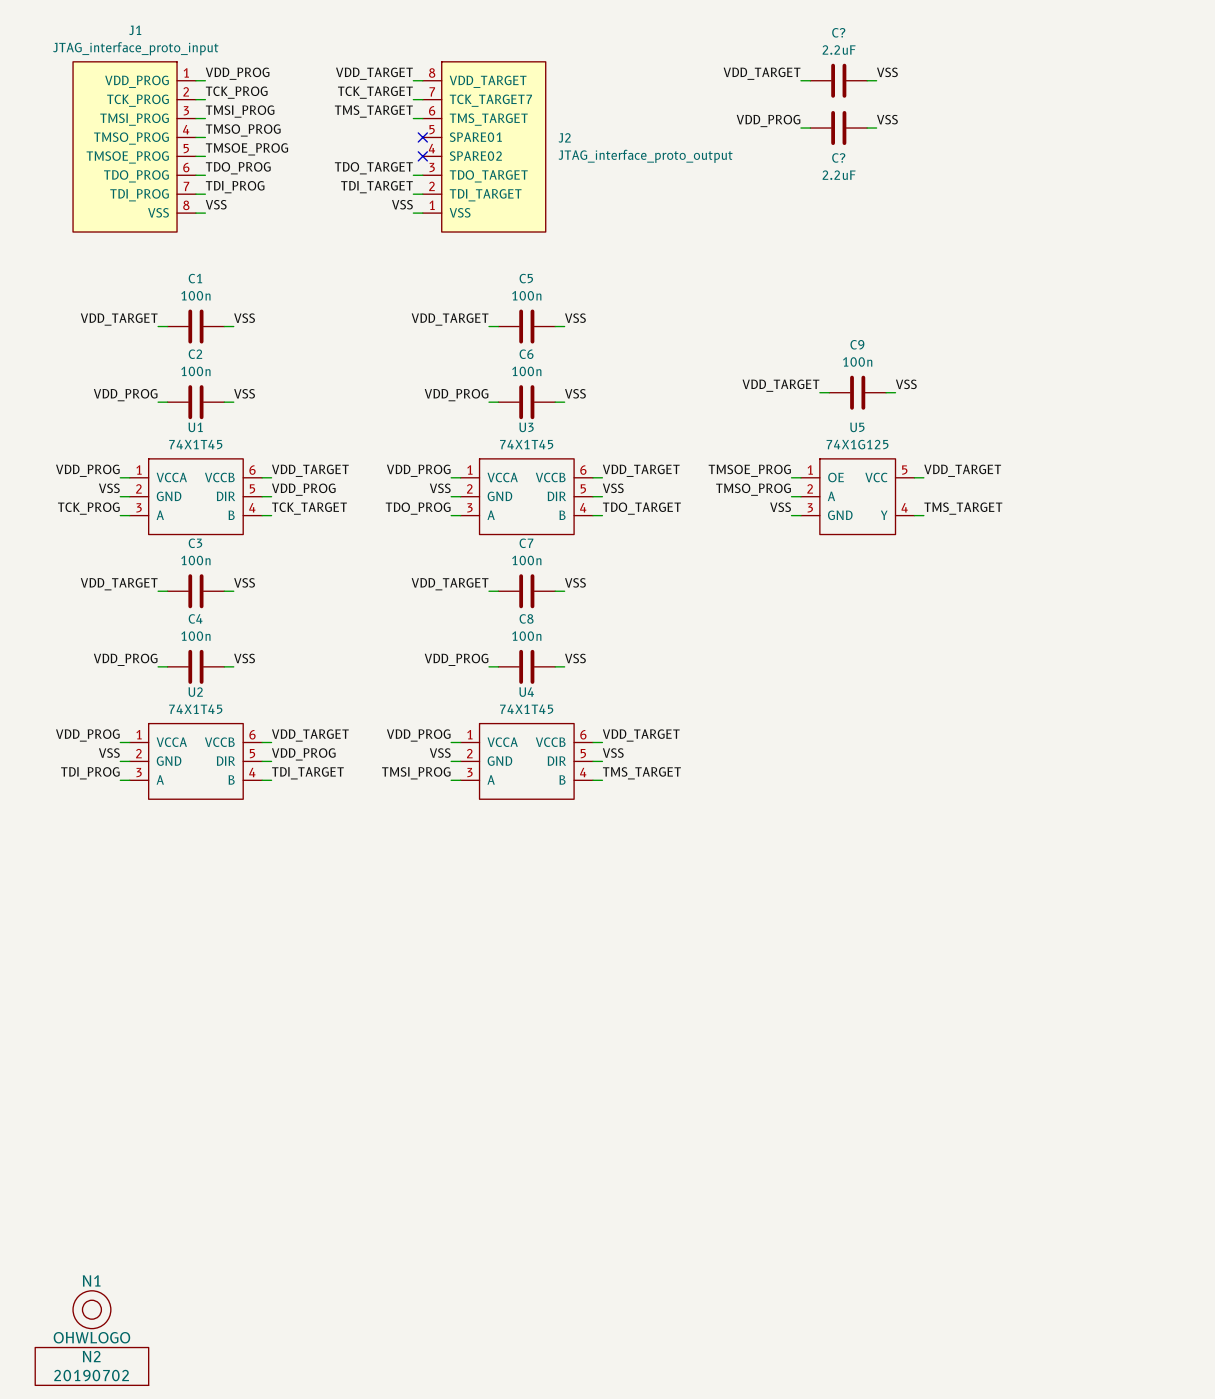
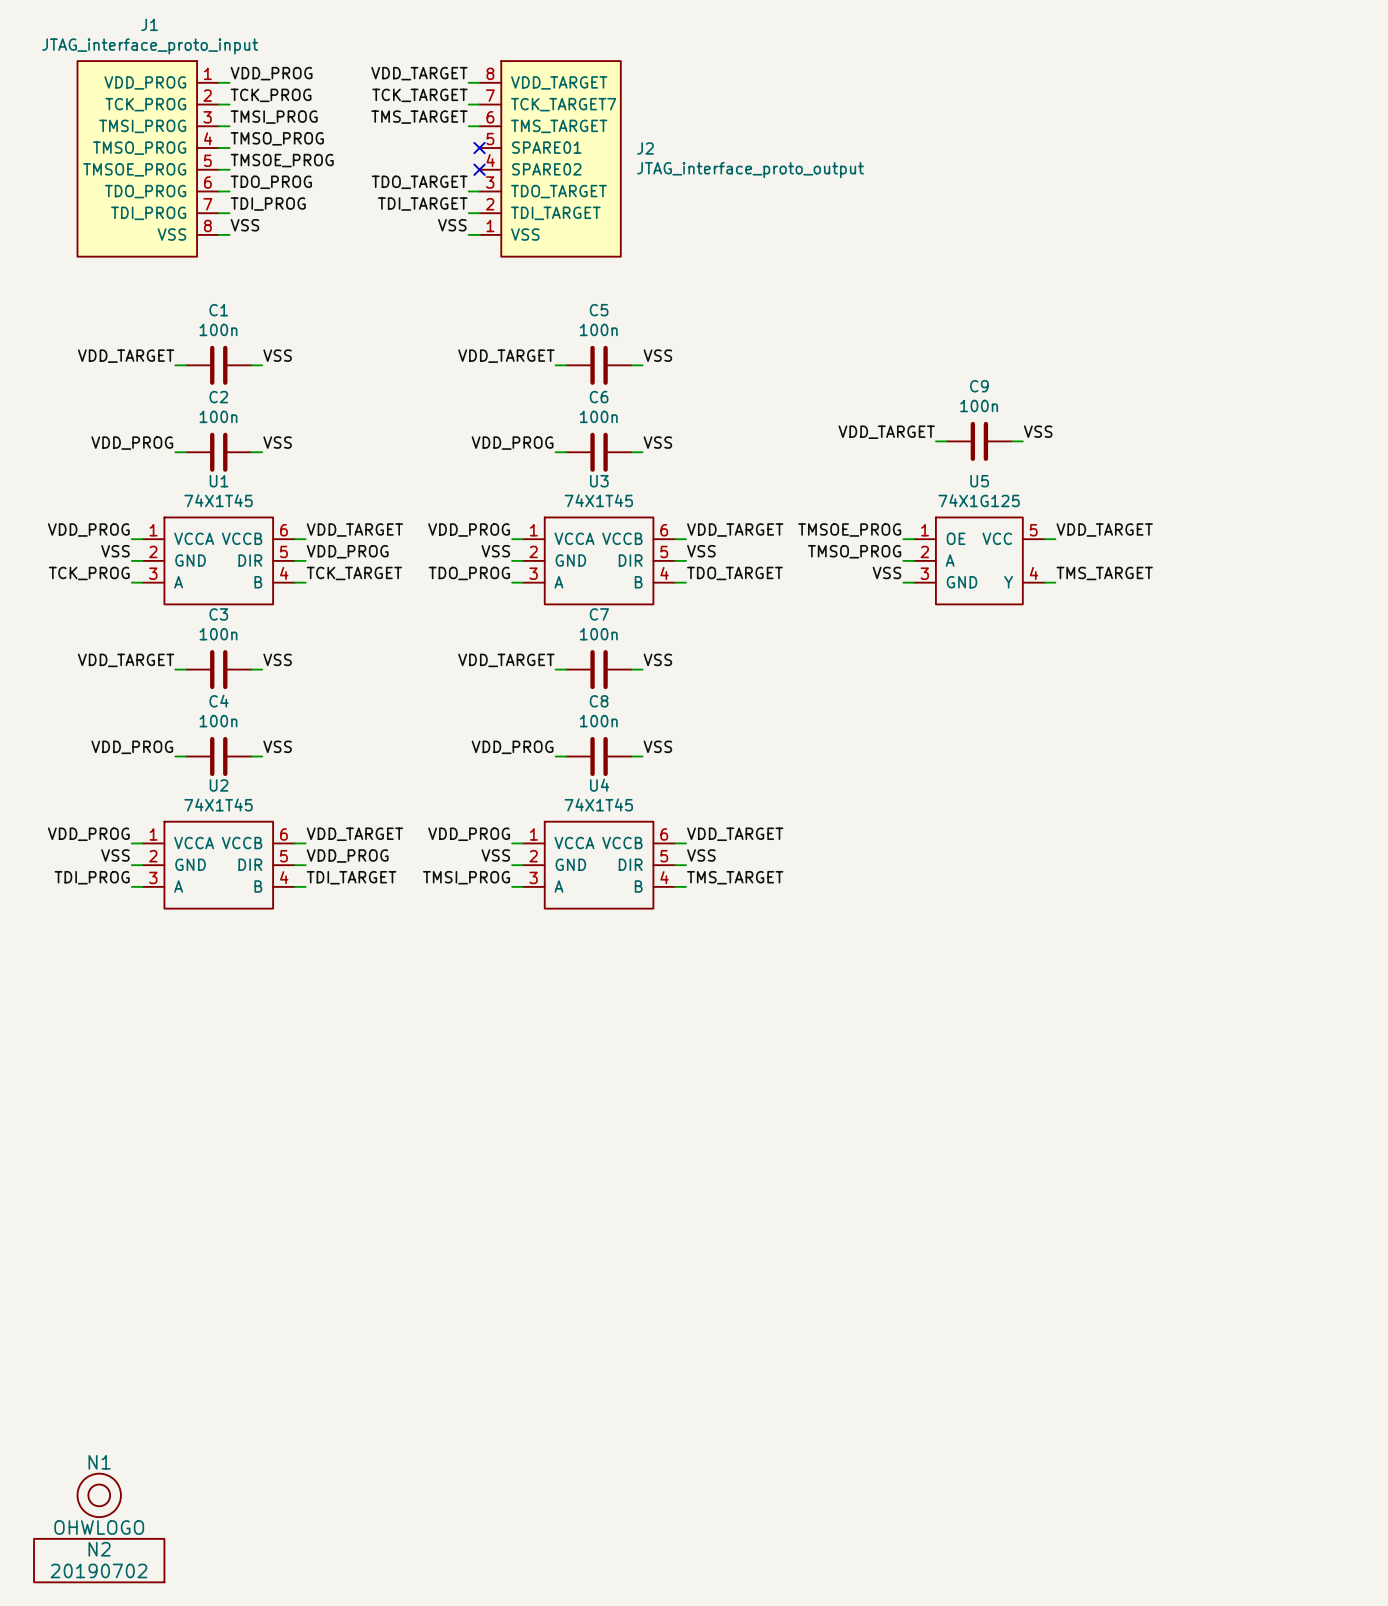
label: VSS (887, 72) -> none
label: VDD_TARGET (762, 73) -> none
wire: (800, 80) (810, 80) -> none
C?: 2.2uF (838, 80) -> none
wire: (867, 80) (876, 80) -> none
label: VSS (887, 119) -> none
label: VDD_PROG (768, 120) -> none
wire: (800, 128) (810, 128) -> none
C?: 2.2uF (838, 128) -> none
wire: (867, 128) (876, 128) -> none

